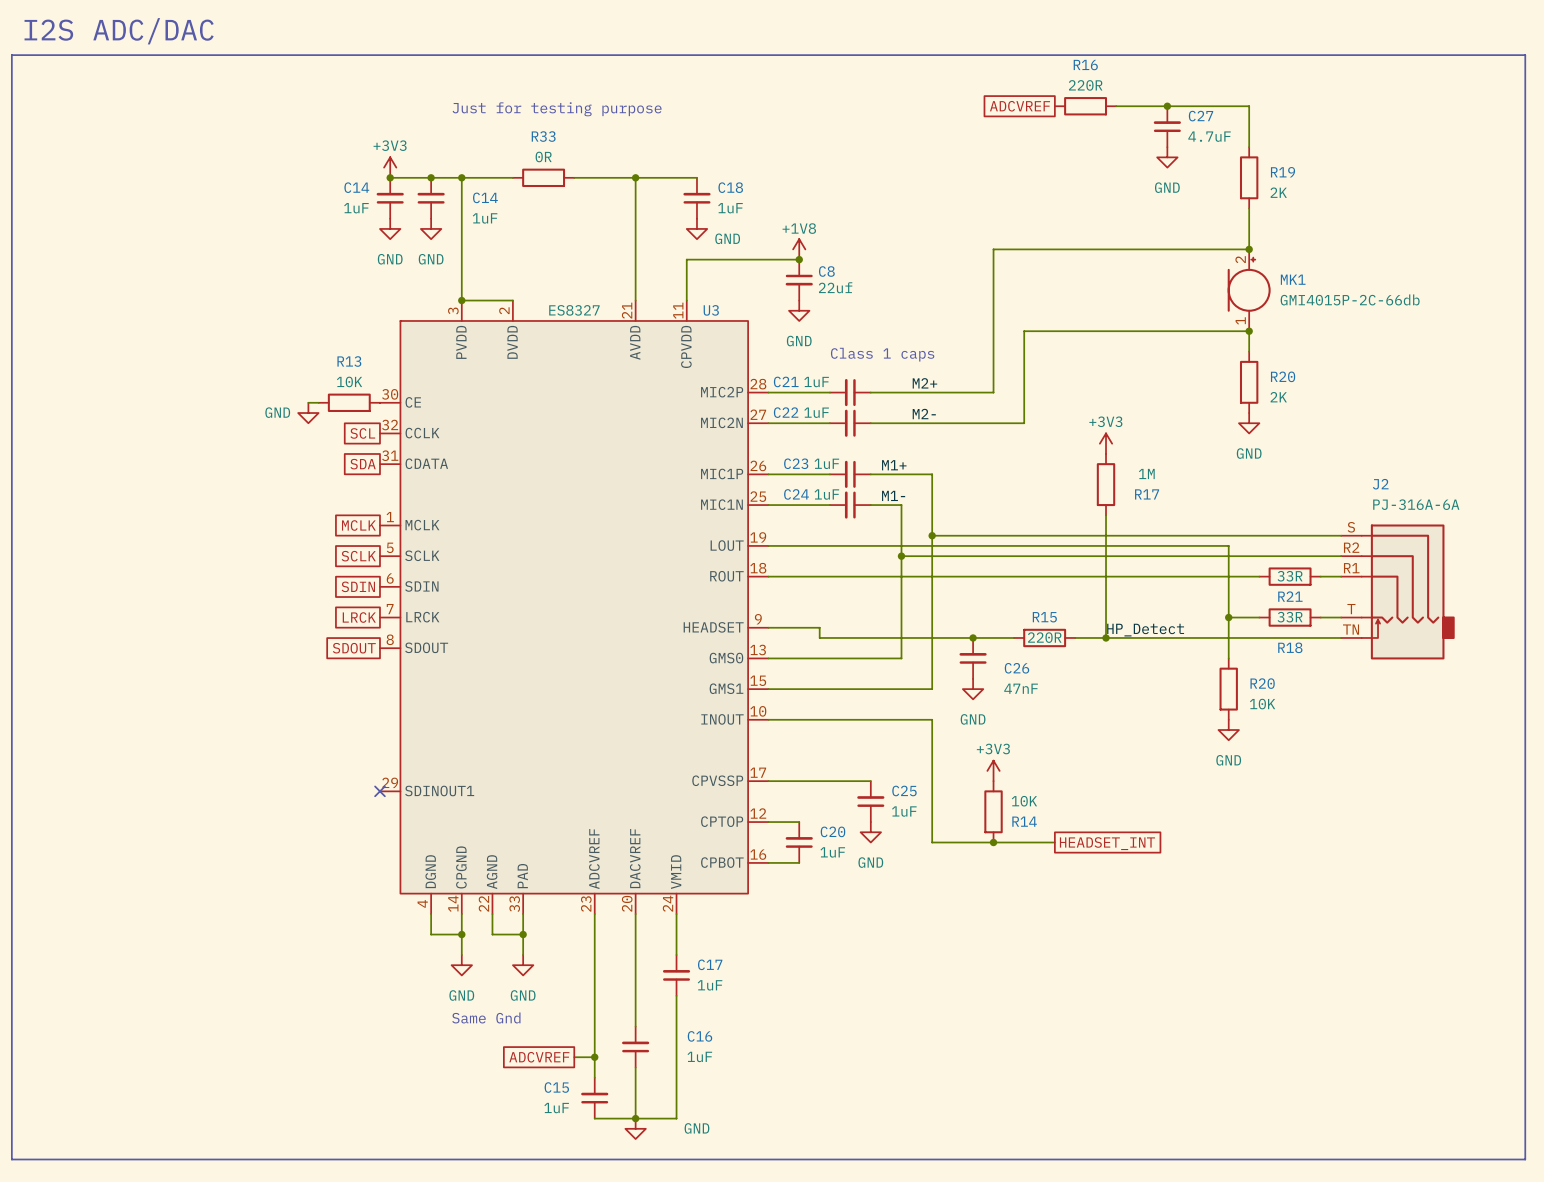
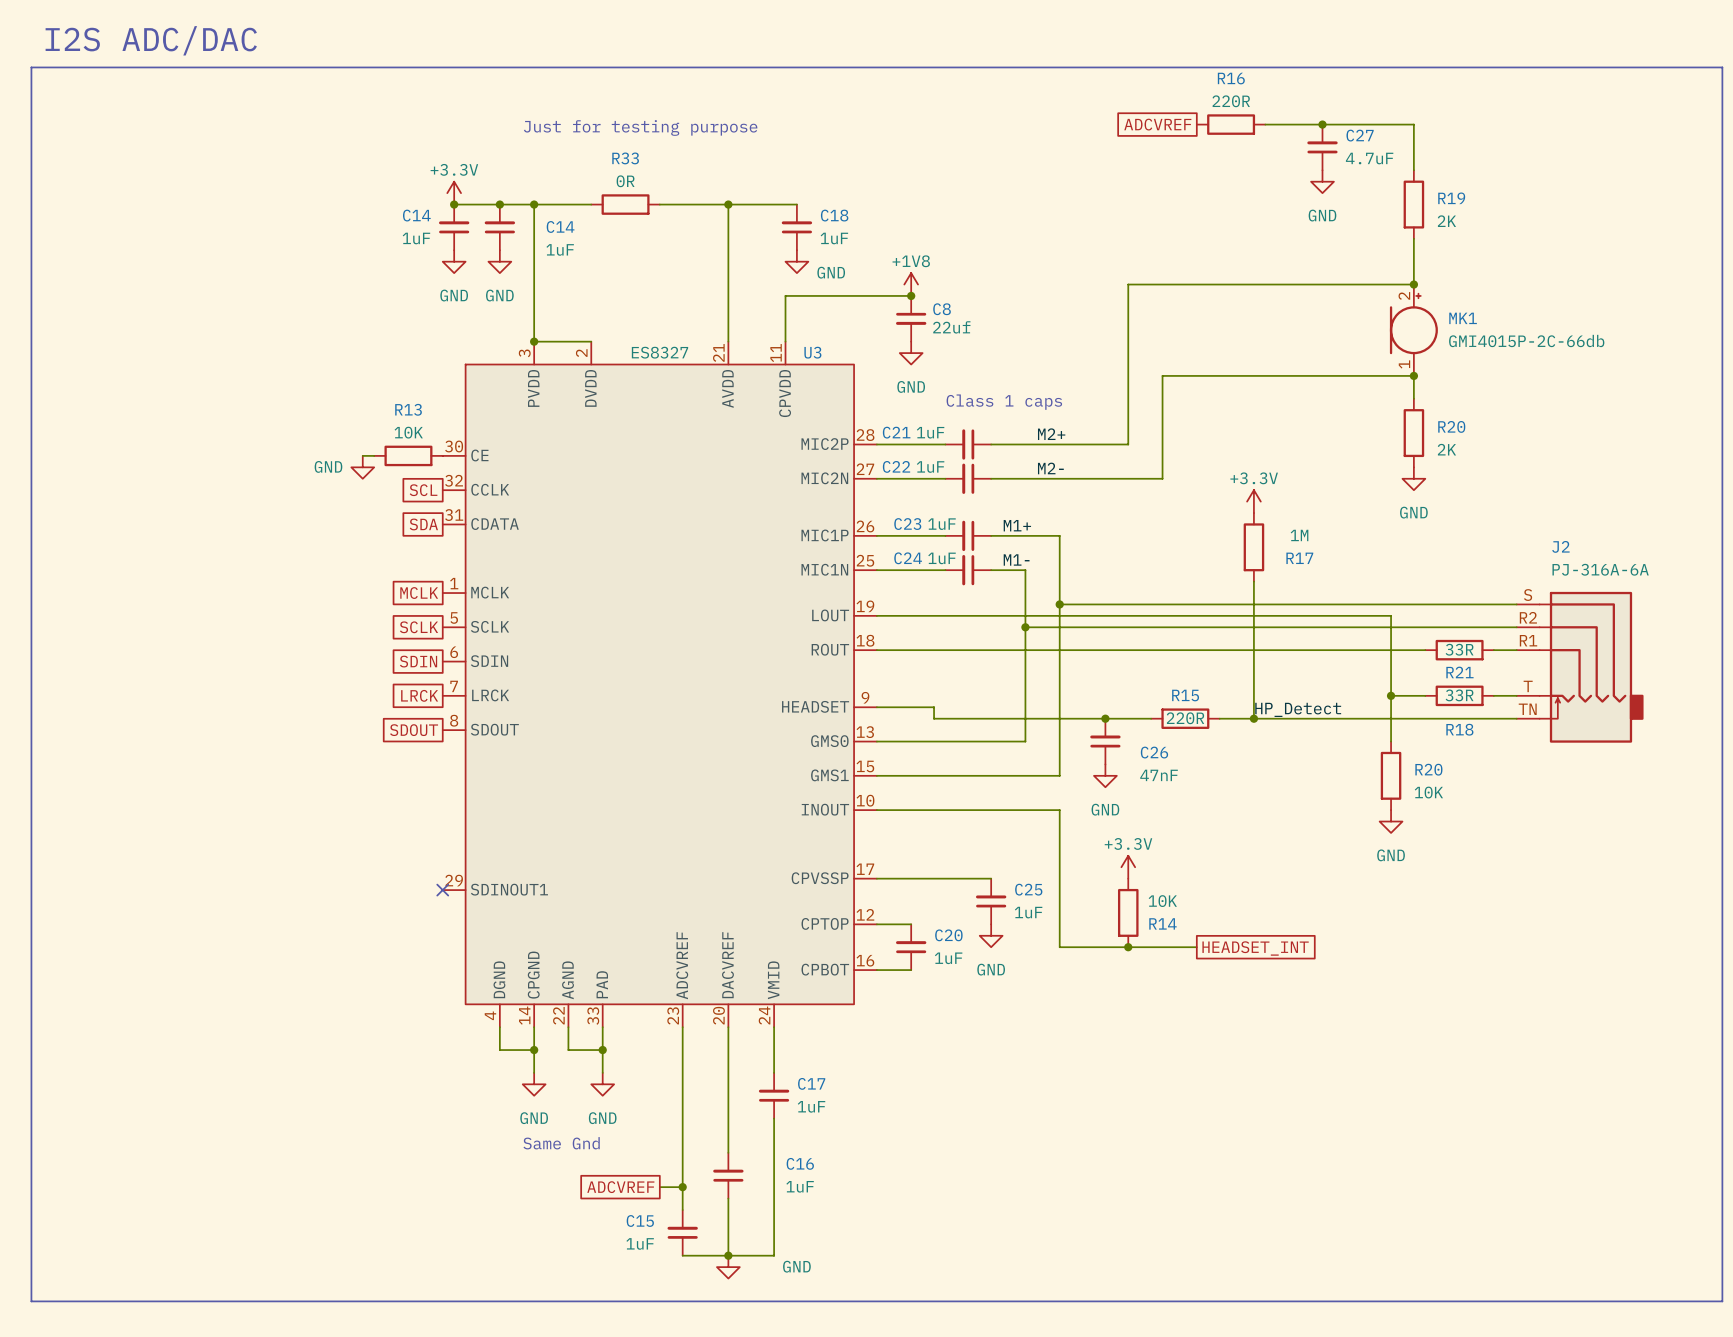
power symbol: +3V3 (390, 167) -> +3.3V (454, 193)
power symbol: +3V3 (1106, 443) -> +3.3V (1253, 501)
power symbol: +3V3 (993, 770) -> +3.3V (1128, 867)

